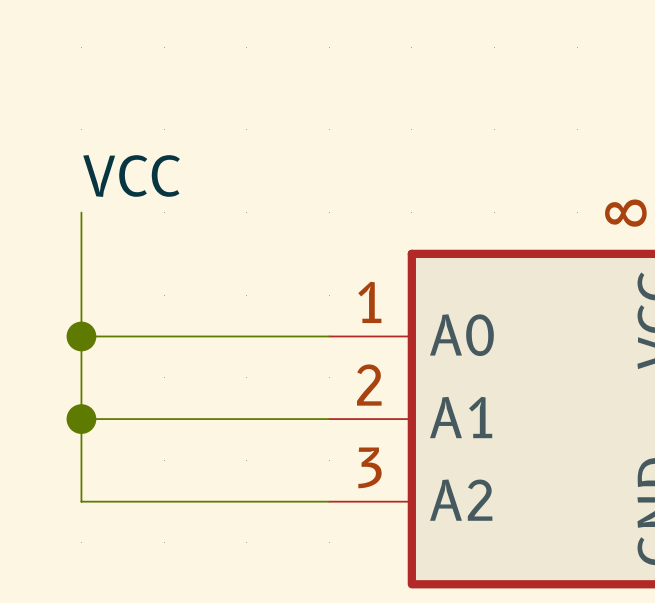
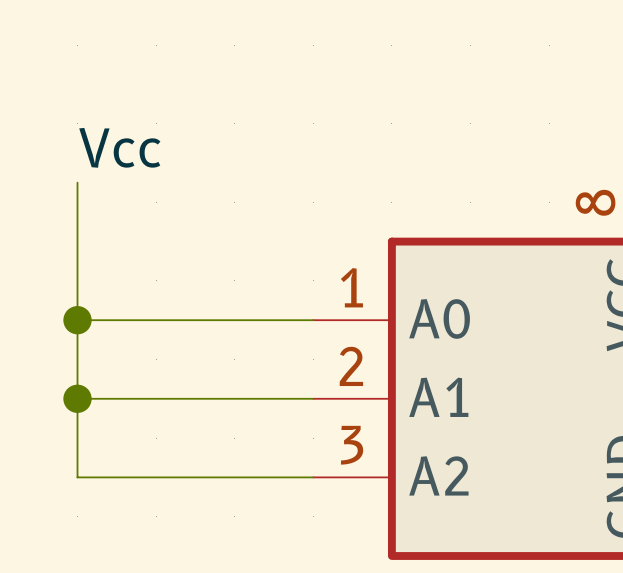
label: VCC (131, 175) -> Vcc (119, 147)
wire: none -> (77, 182) (77, 202)

